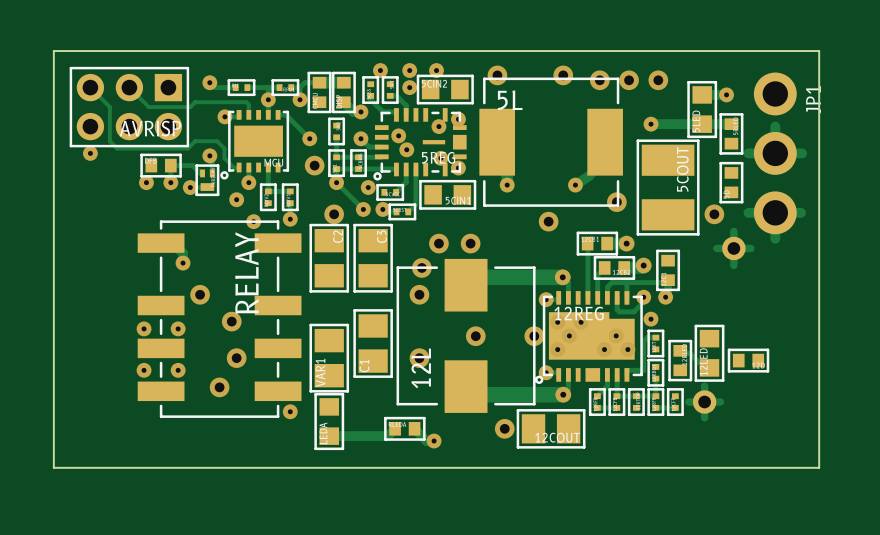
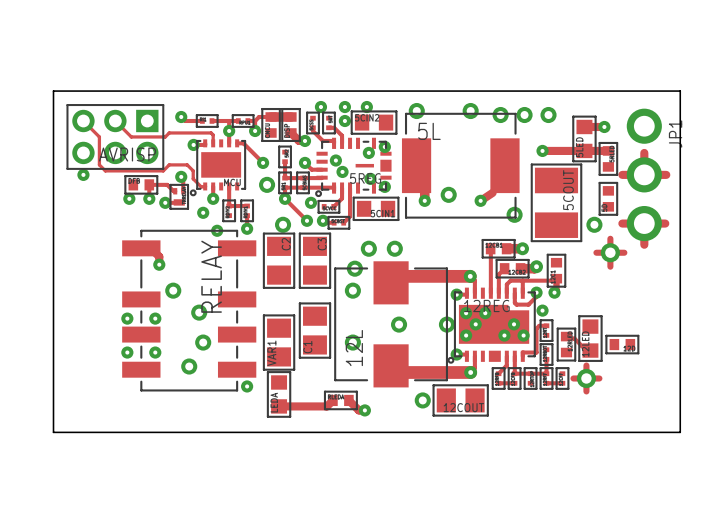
via position: (548, 221) -> (448, 194)

